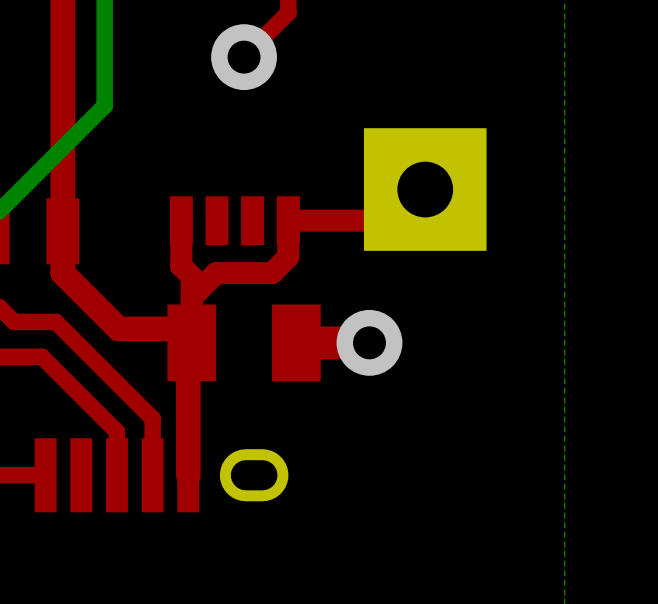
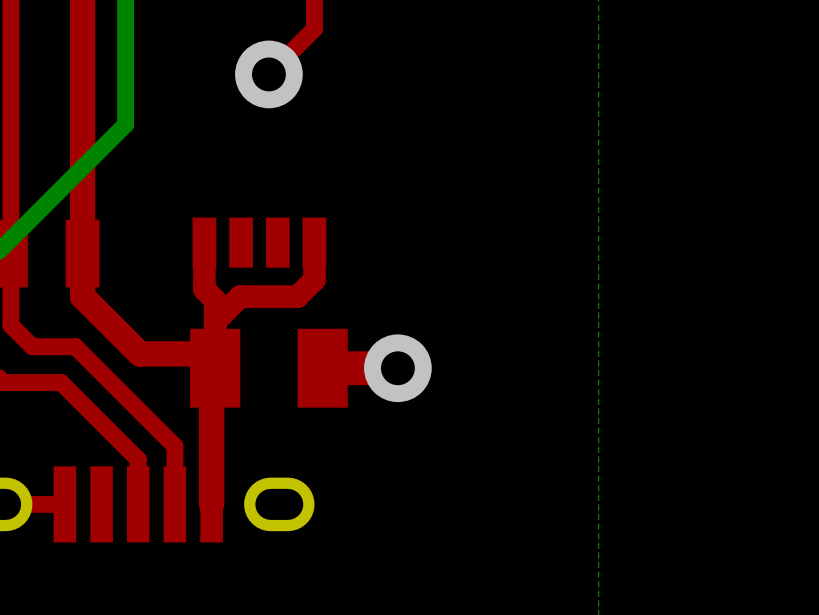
top track: (425, 189) (394, 220) (288, 220) -> none
part: (425, 189) -> none

